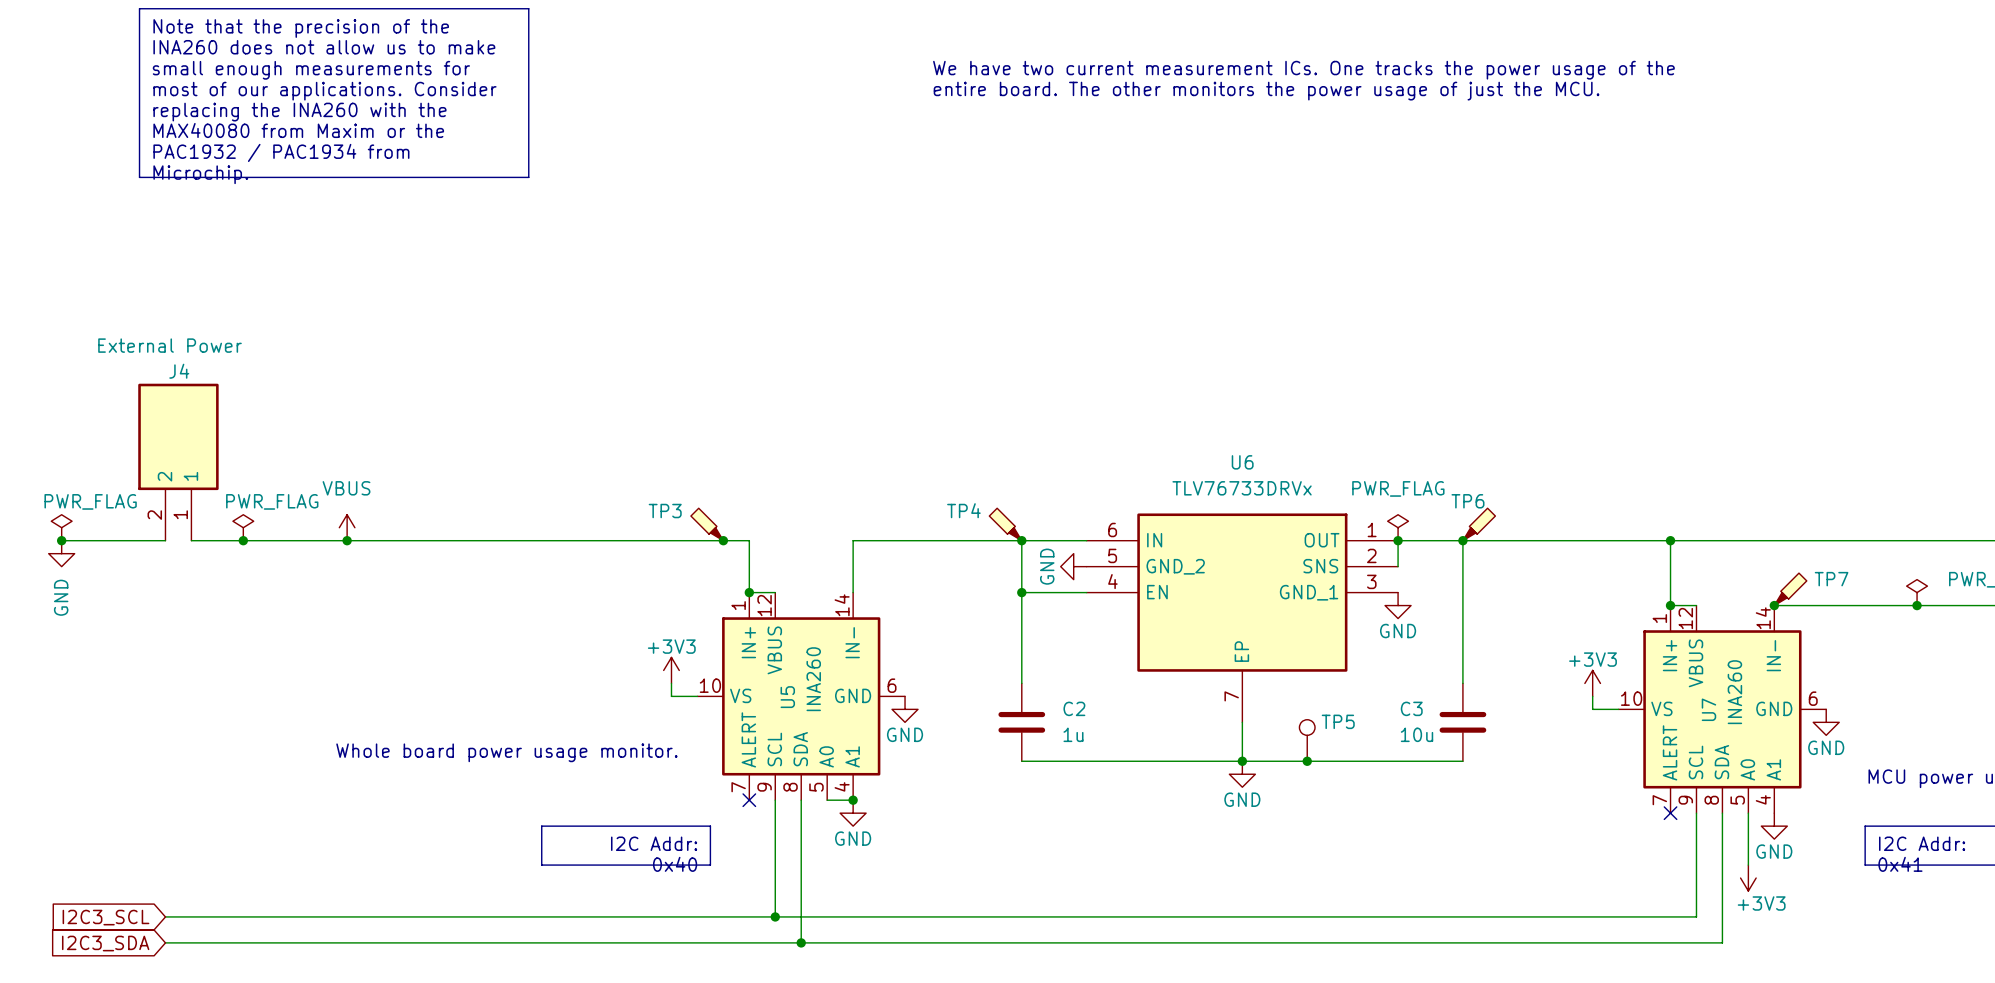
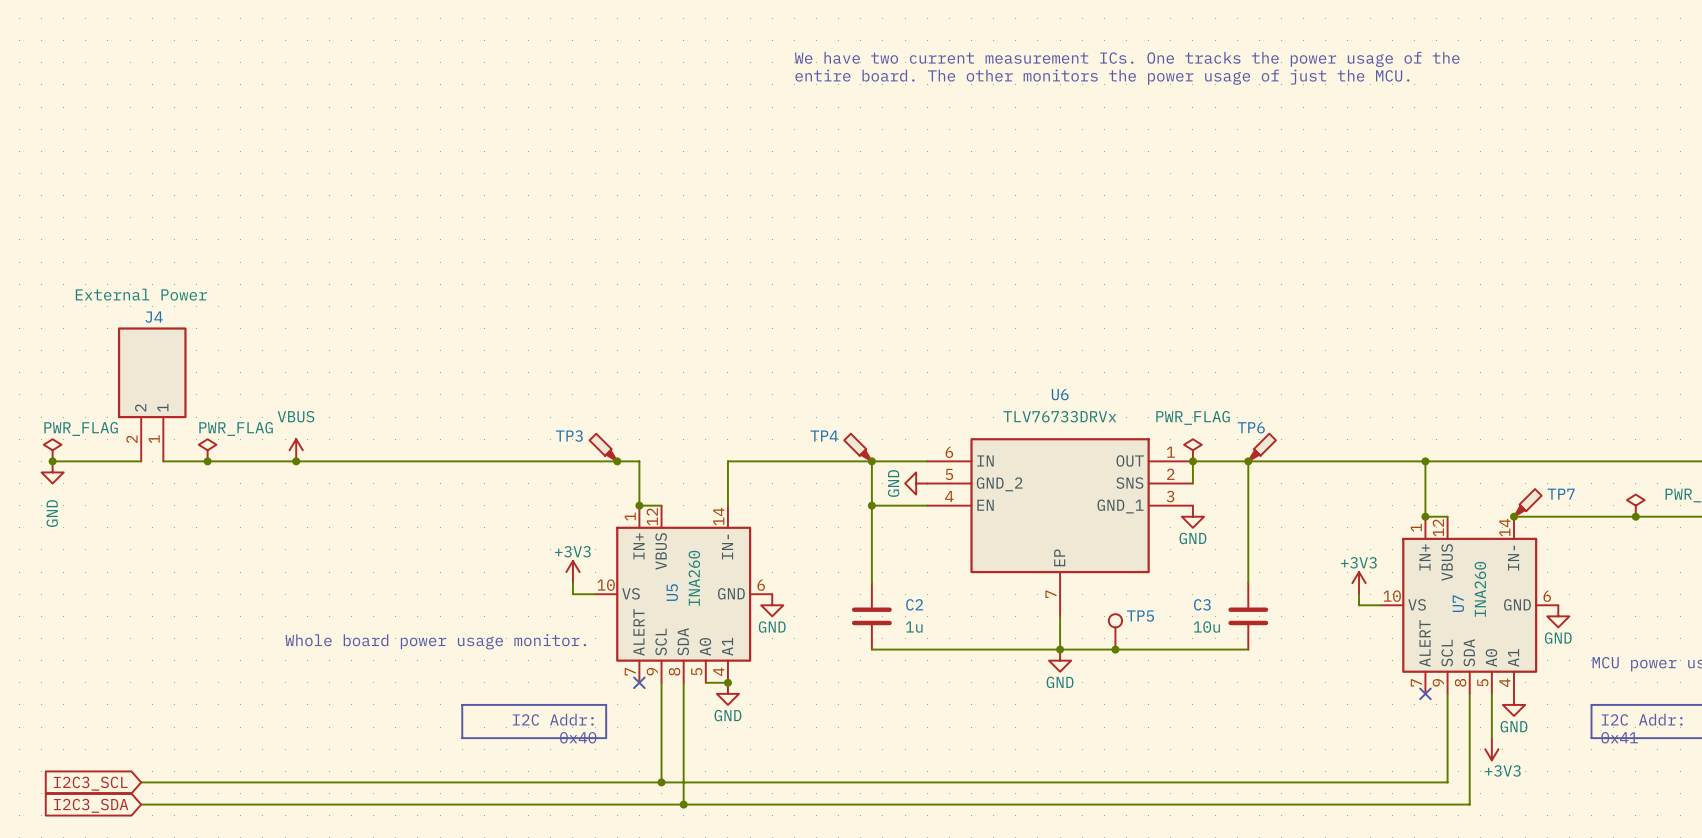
line: (139, 8) (528, 8) (528, 177) (139, 177) (139, 8) -> none
text: Note that the precision of the (301, 28) -> none
text: INA260 does not allow us to make (324, 47) -> none
text: small enough measurements for (311, 70) -> none
text: most of our applications. Consider (324, 91) -> none
text: replacing the INA260 with the (299, 112) -> none
text: MAX40080 from Maxim or the (298, 130) -> none
text: PAC1932 / PAC1934 from (281, 152) -> none
text: Microchip. (200, 174) -> none

